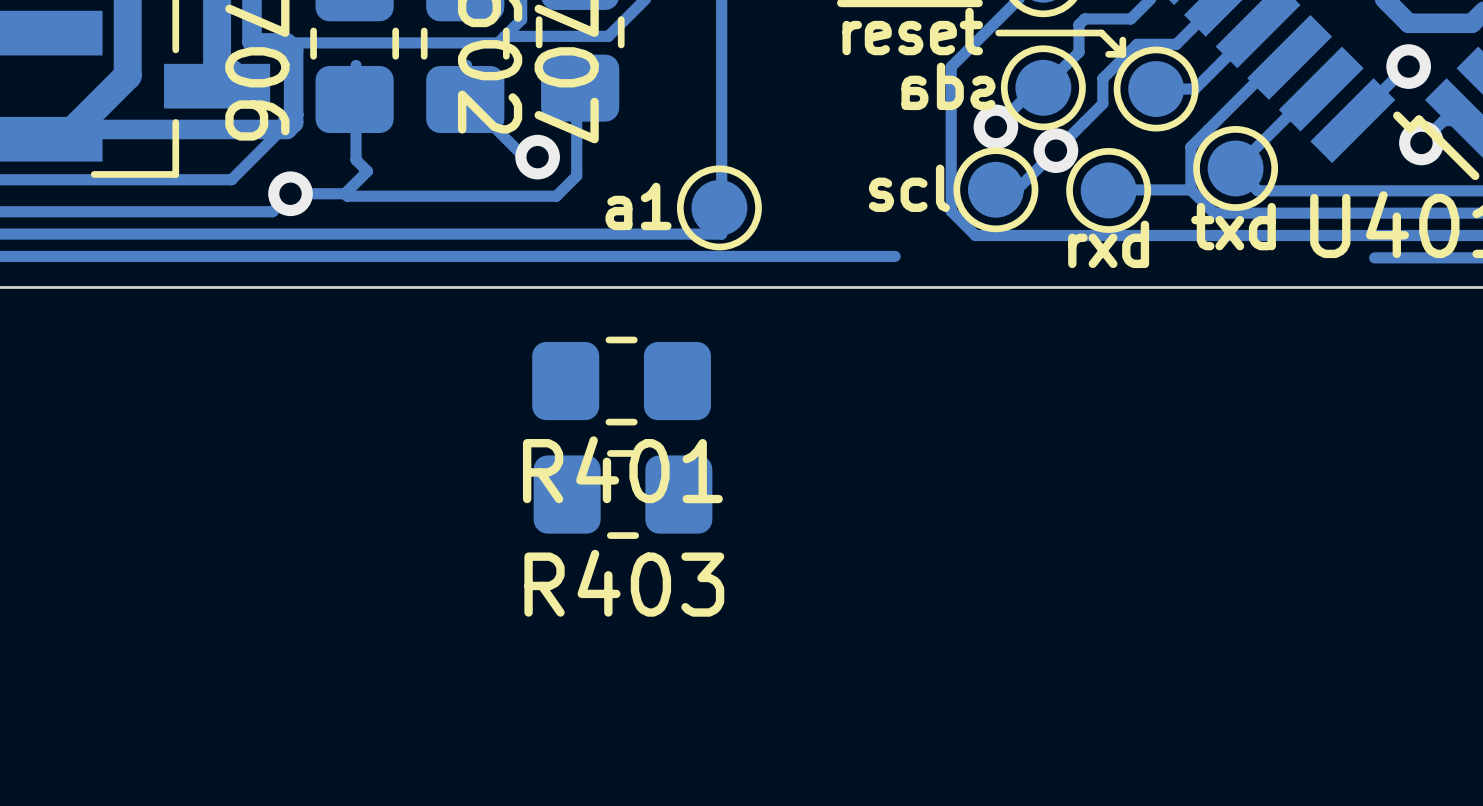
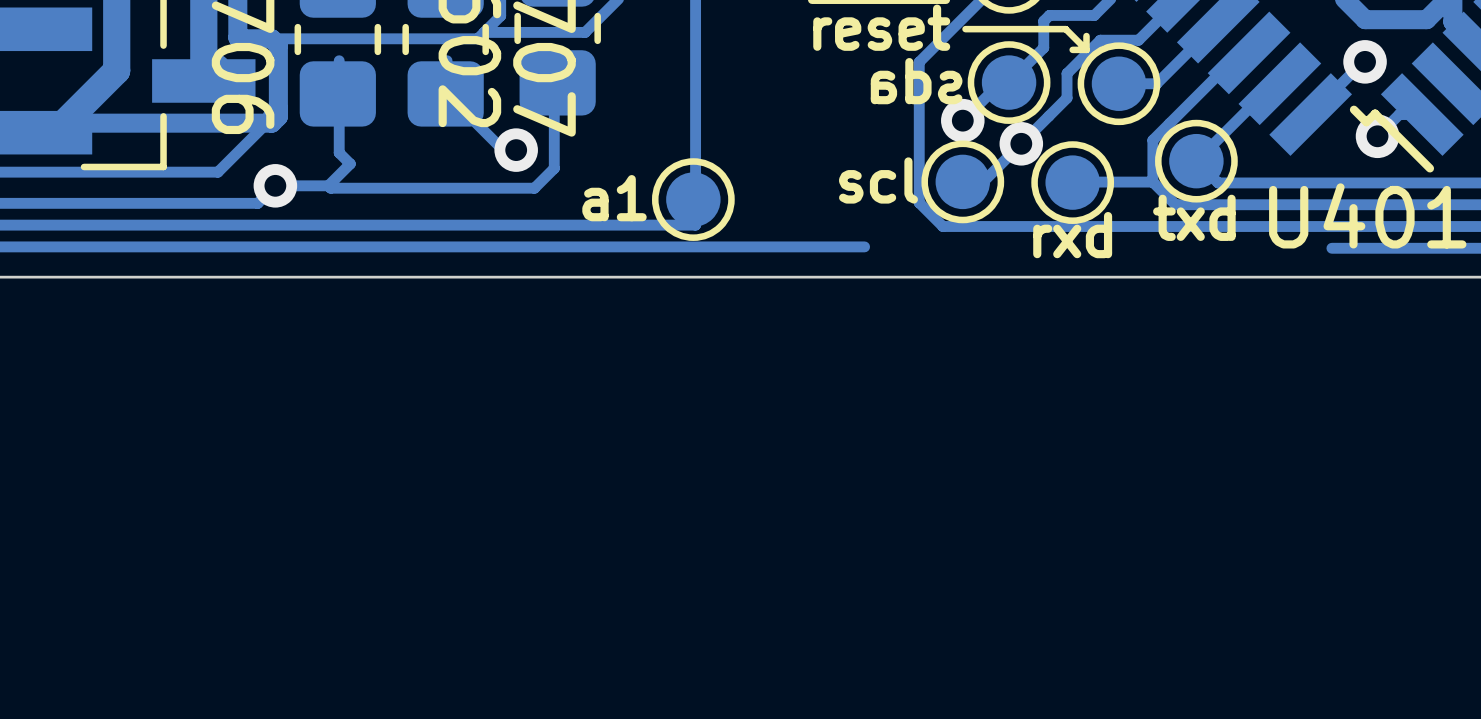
R401: (621, 381) -> none
R403: (622, 494) -> none

